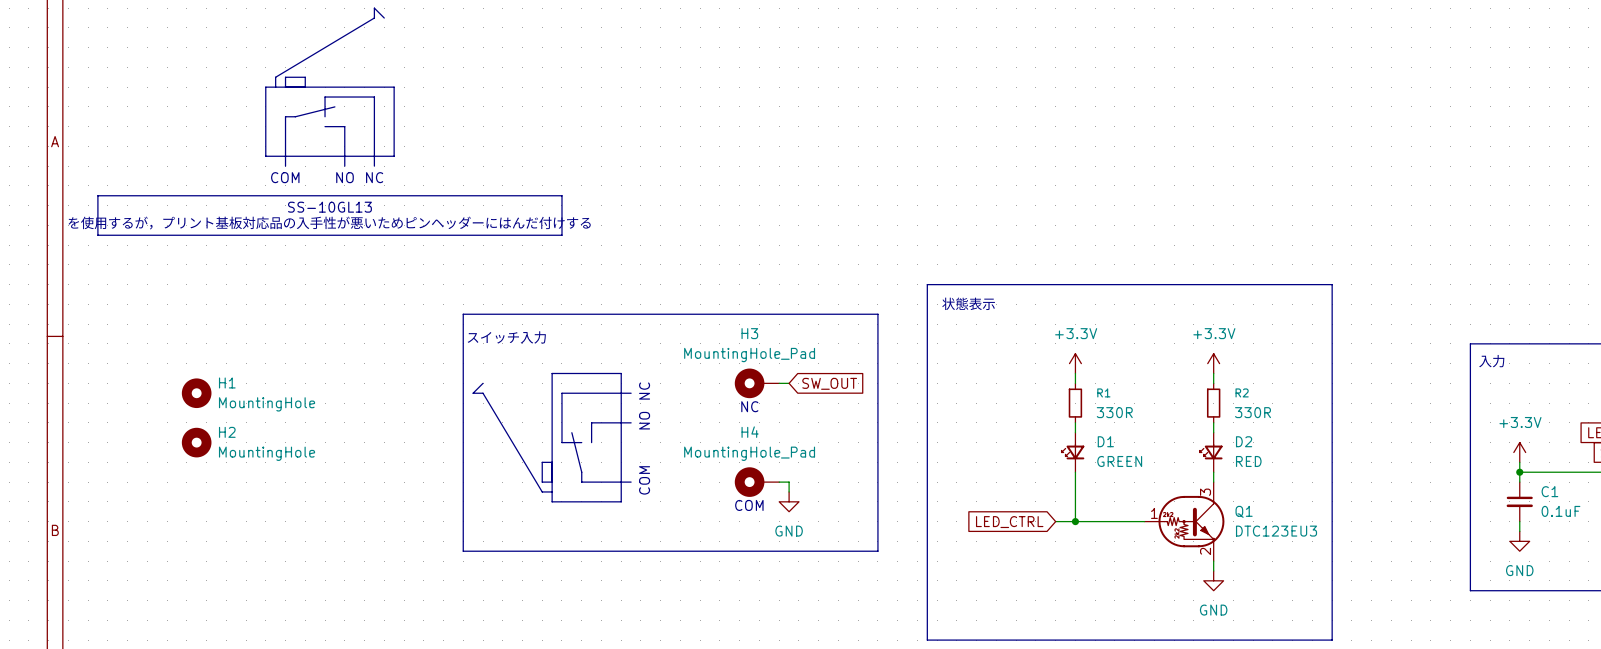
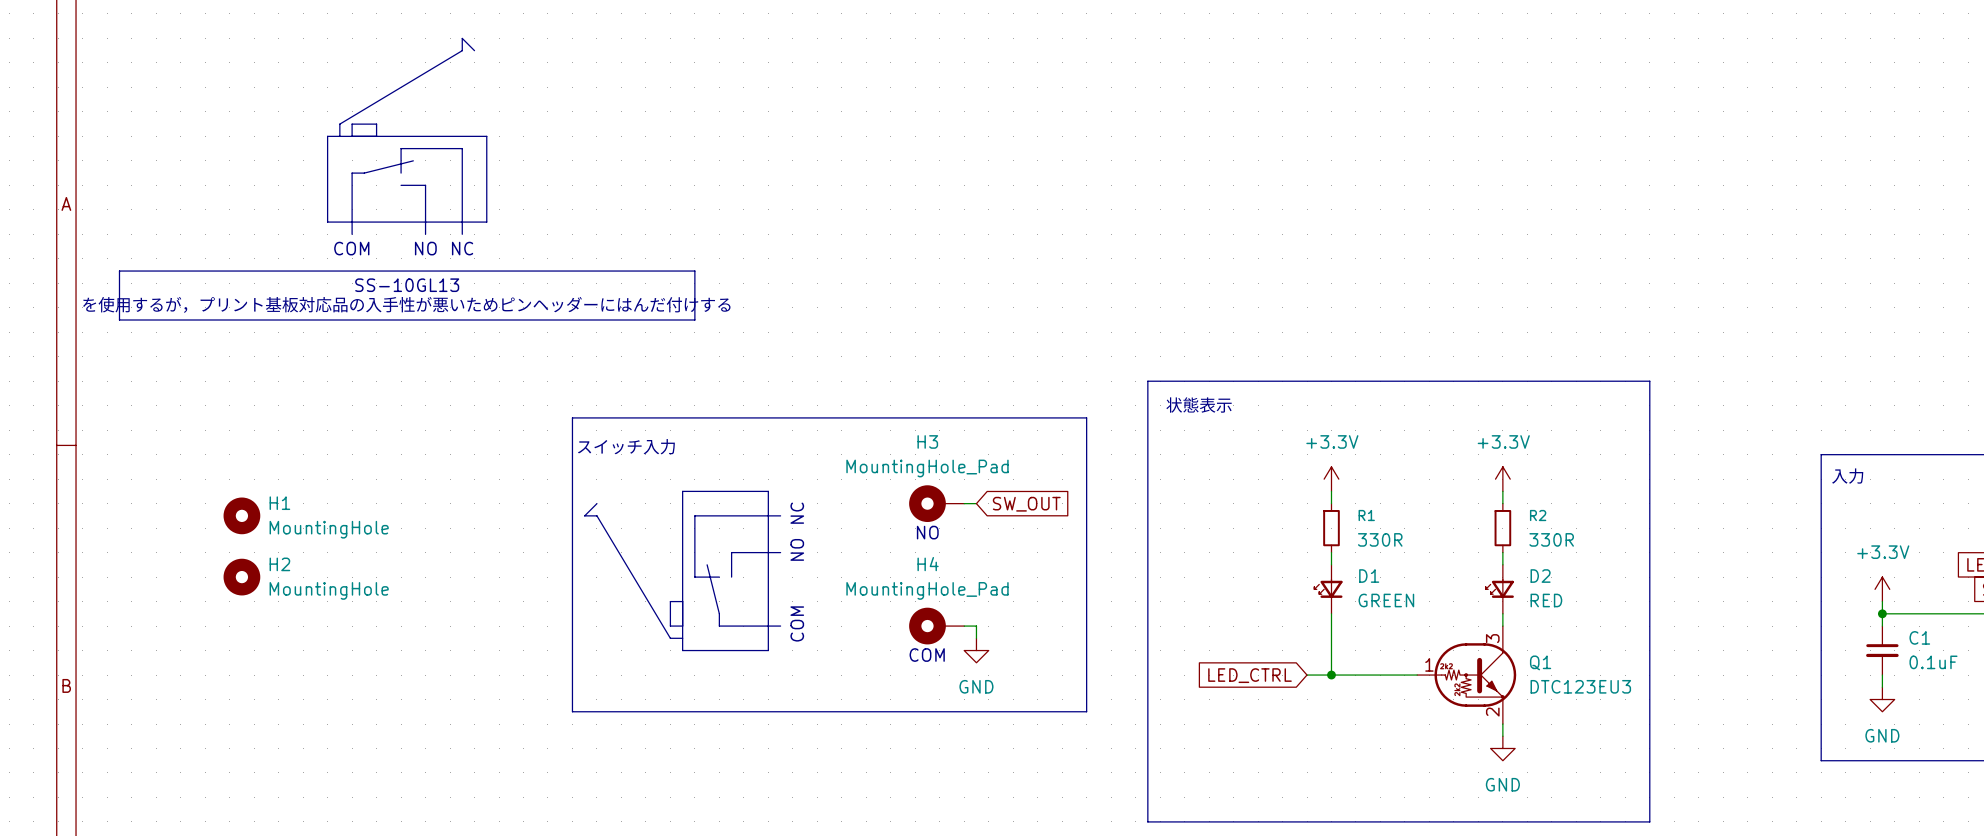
text: NC (749, 406) -> NO (927, 532)

